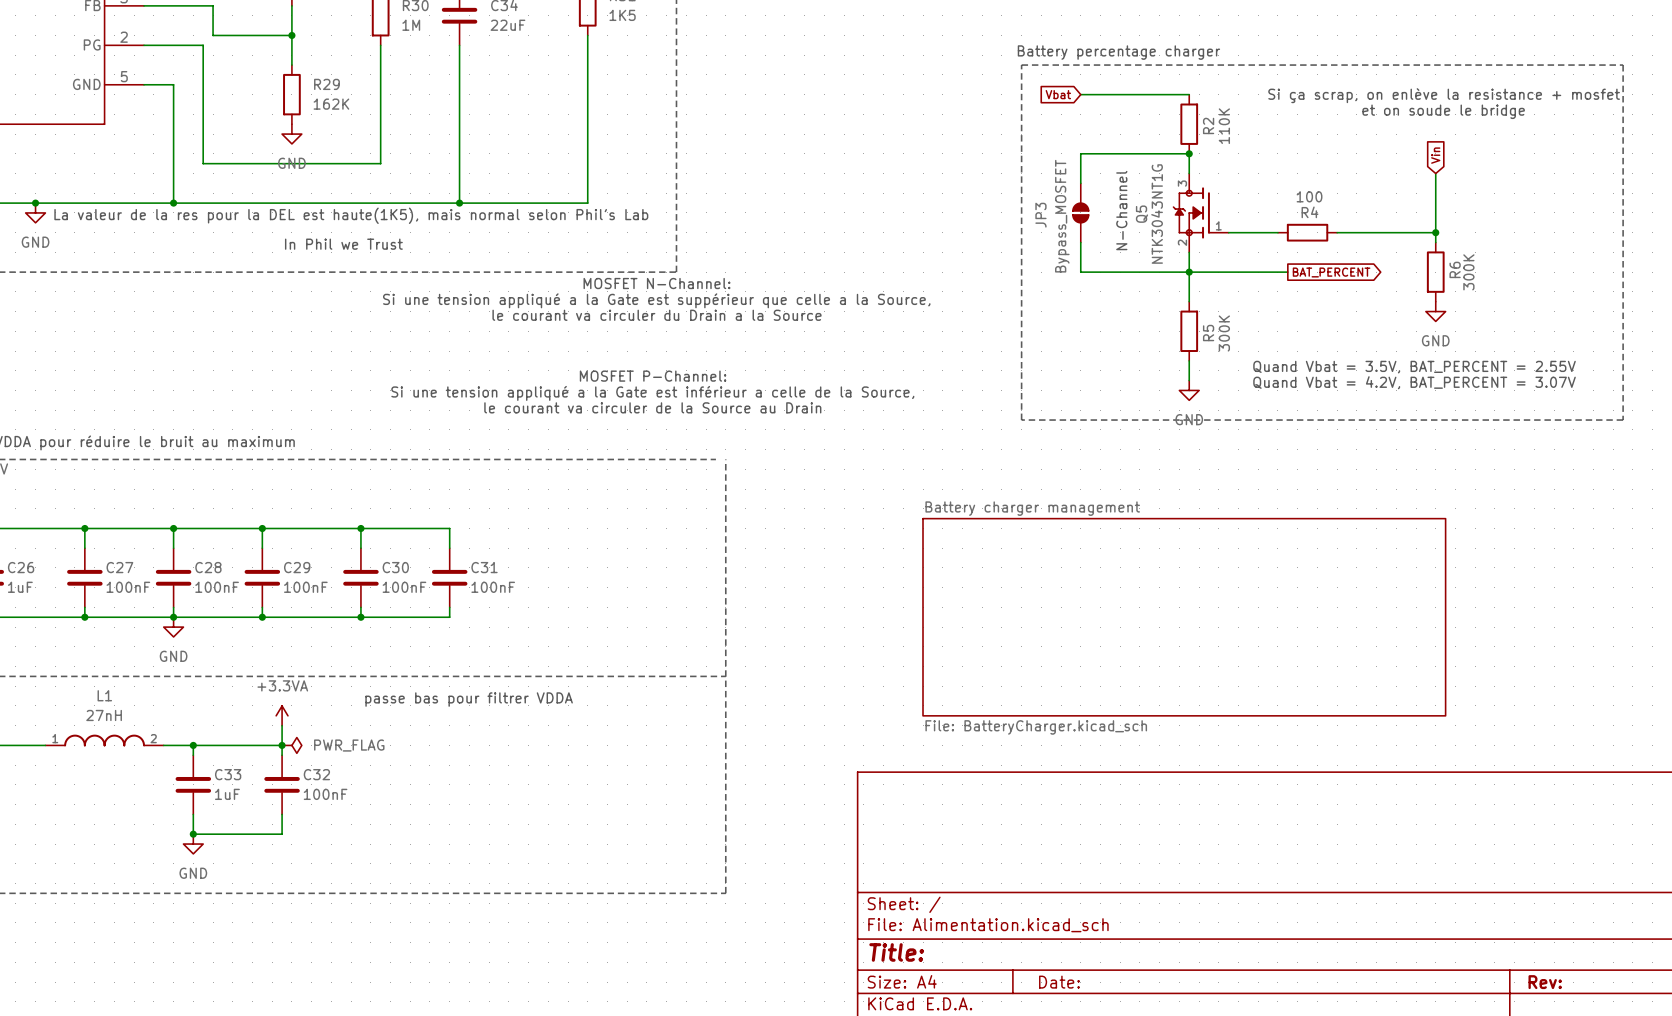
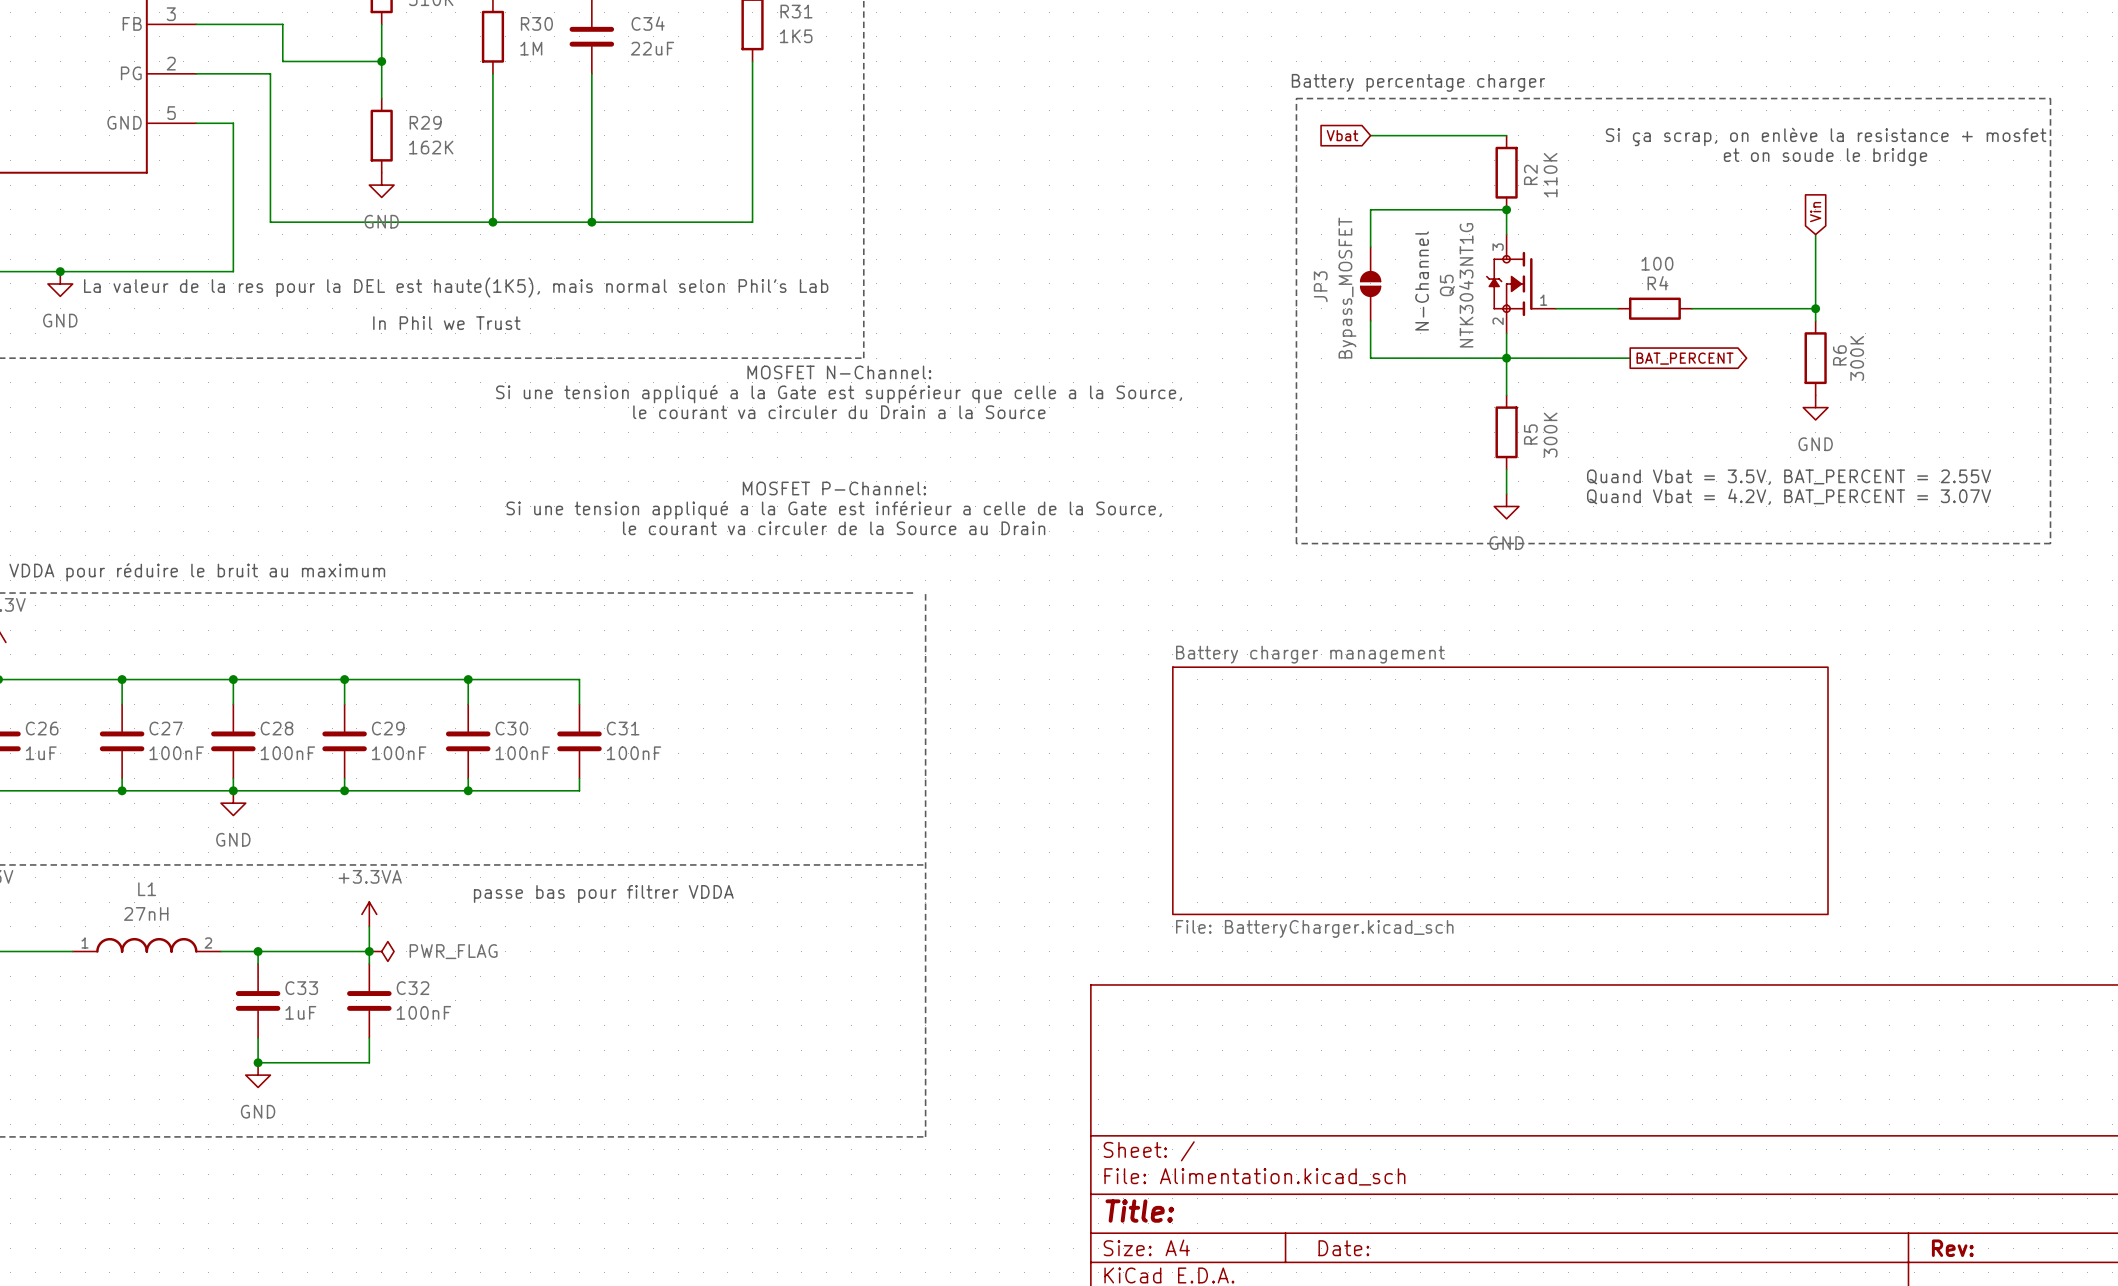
junction: none -> (492, 222)
wire: (459, 163) (459, 203) -> none
wire: (587, 163) (587, 203) (173, 203) -> (752, 222) (492, 222)
junction: (173, 203) -> none
junction position: (459, 203) -> (591, 222)

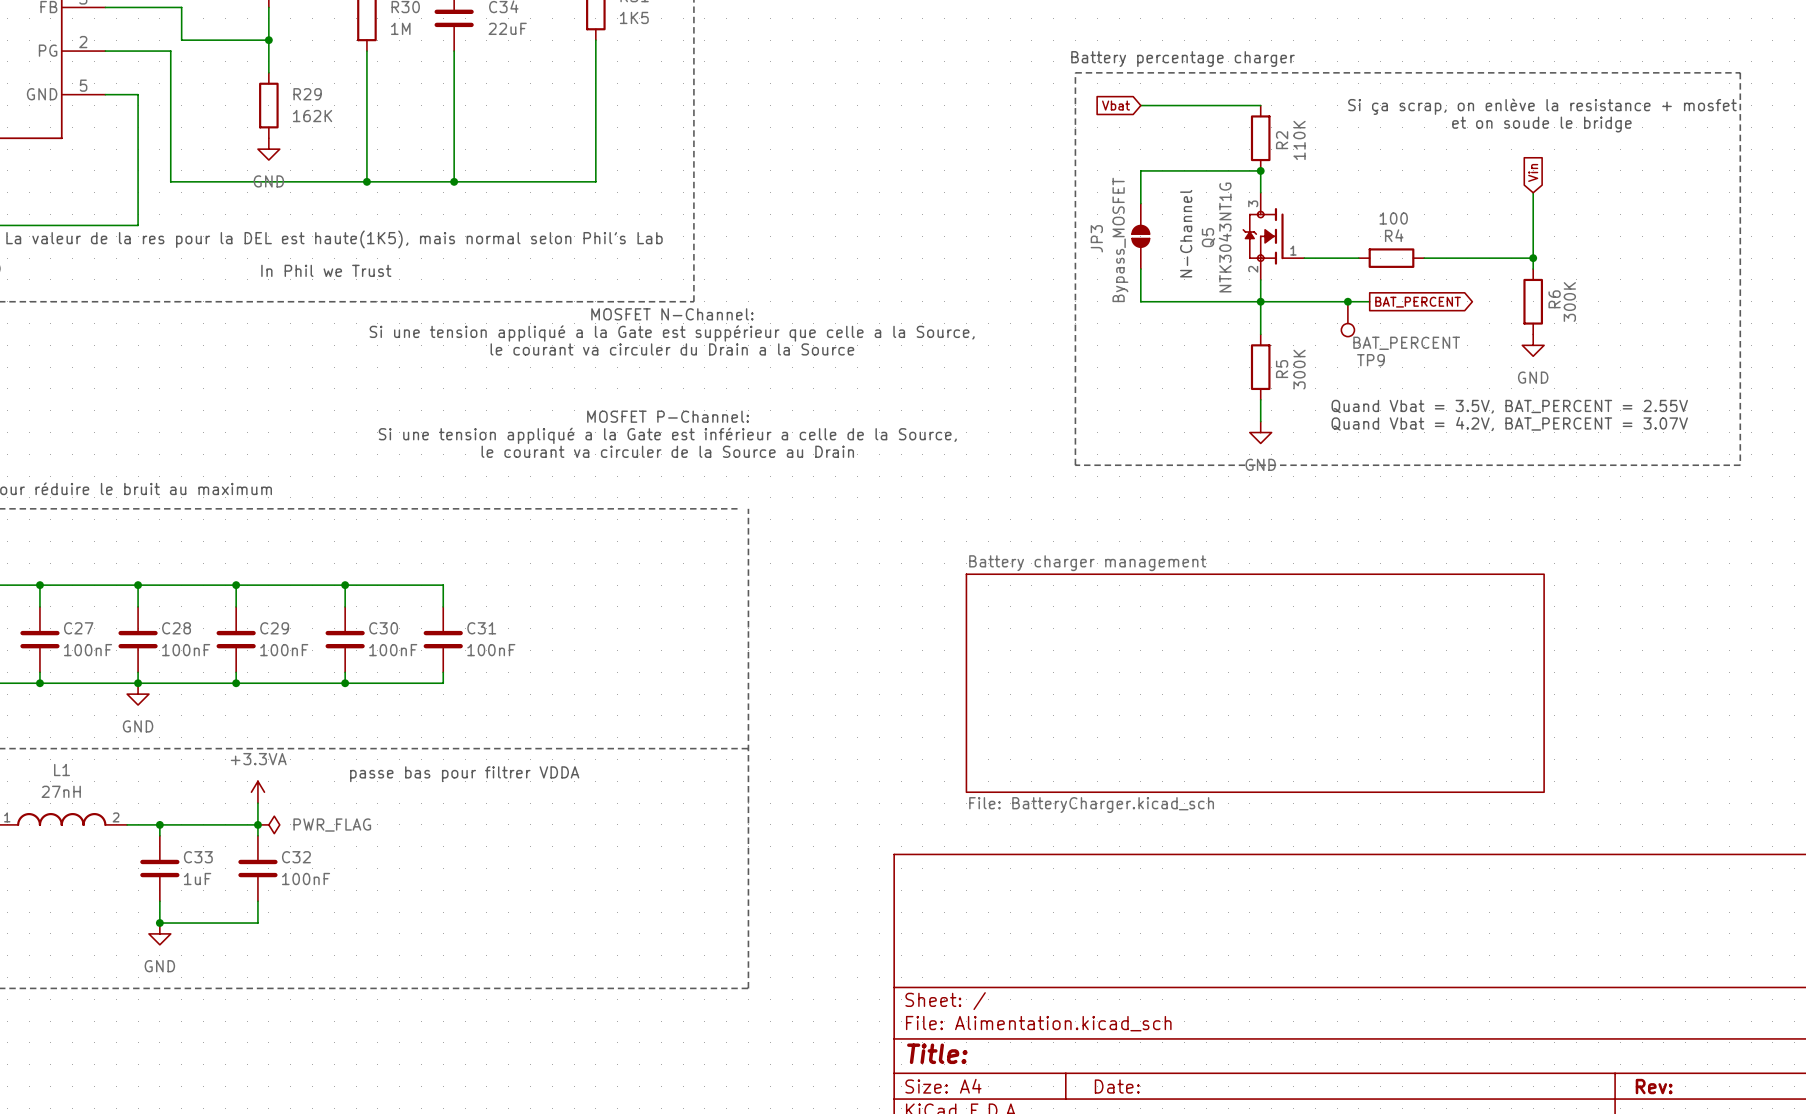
junction: none -> (1347, 301)
TP9: none -> BAT_PERCENT (1347, 319)

